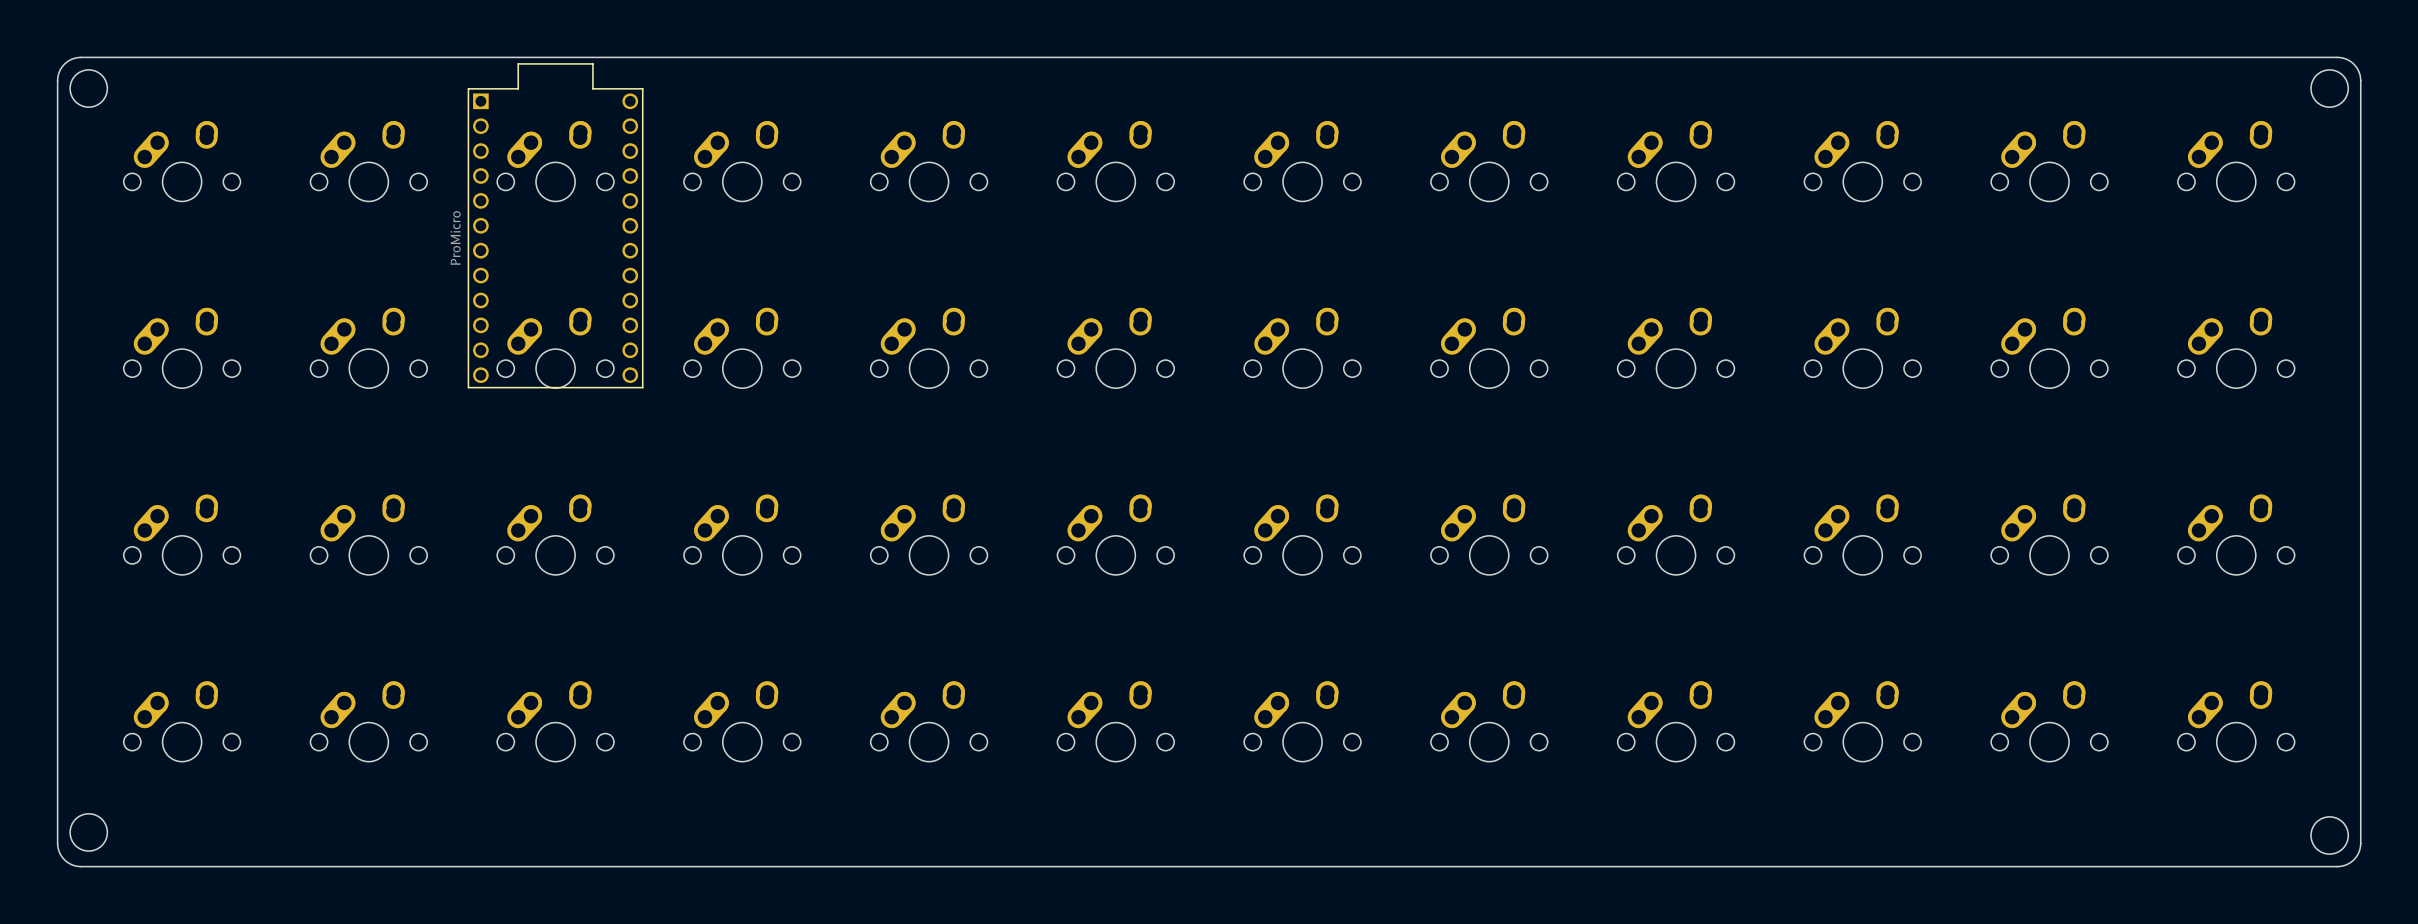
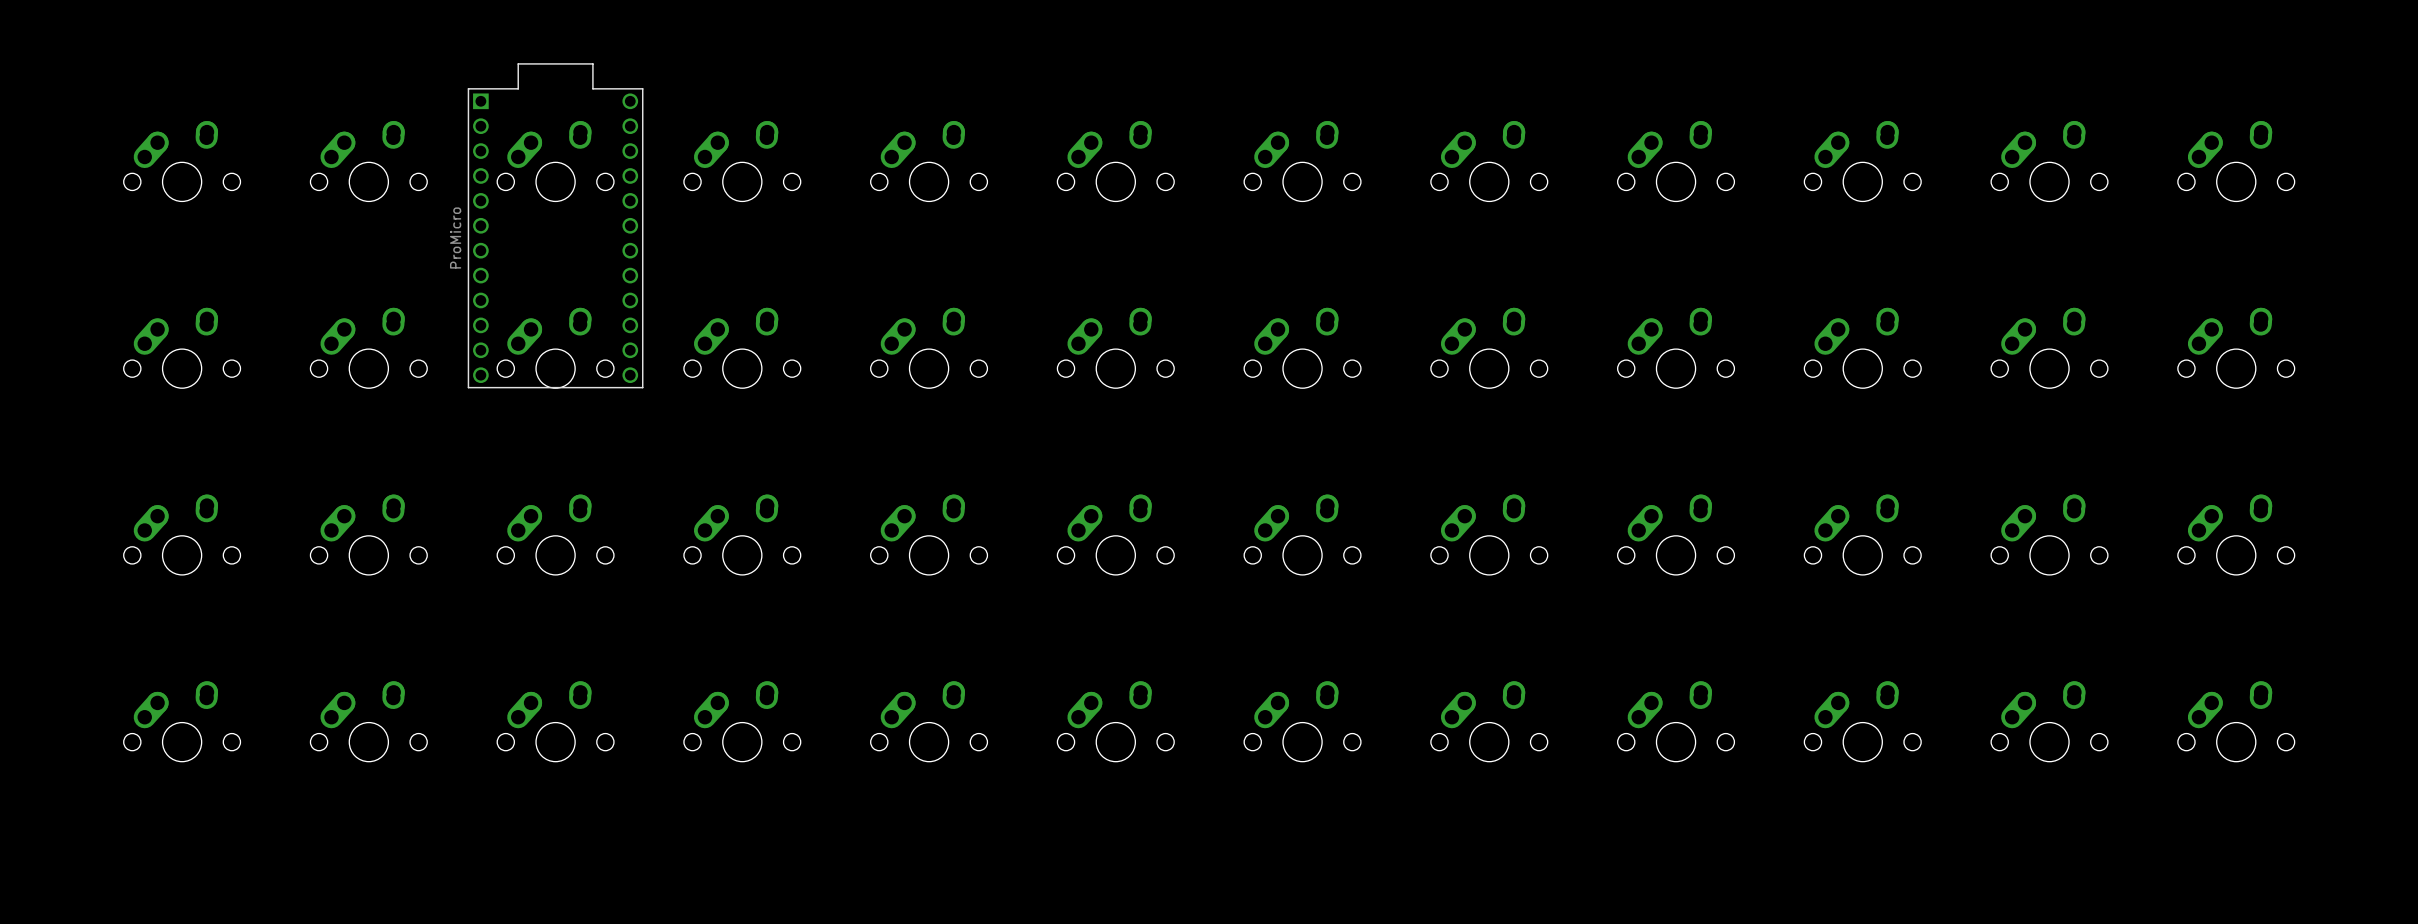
round board edge: [69, 69, 108, 108] -> none
round board edge: [2310, 69, 2349, 108] -> none
round board edge: [69, 813, 108, 852] -> none
round board edge: [2310, 816, 2349, 855] -> none
board edge: (2360, 843) (2360, 80) (2355, 66) (2343, 58) (80, 57) (66, 62) (58, 74) (57, 843) (62, 857) (74, 865) (2337, 866) (2346, 864) (2353, 859) (2358, 852) (2360, 843) -> none

